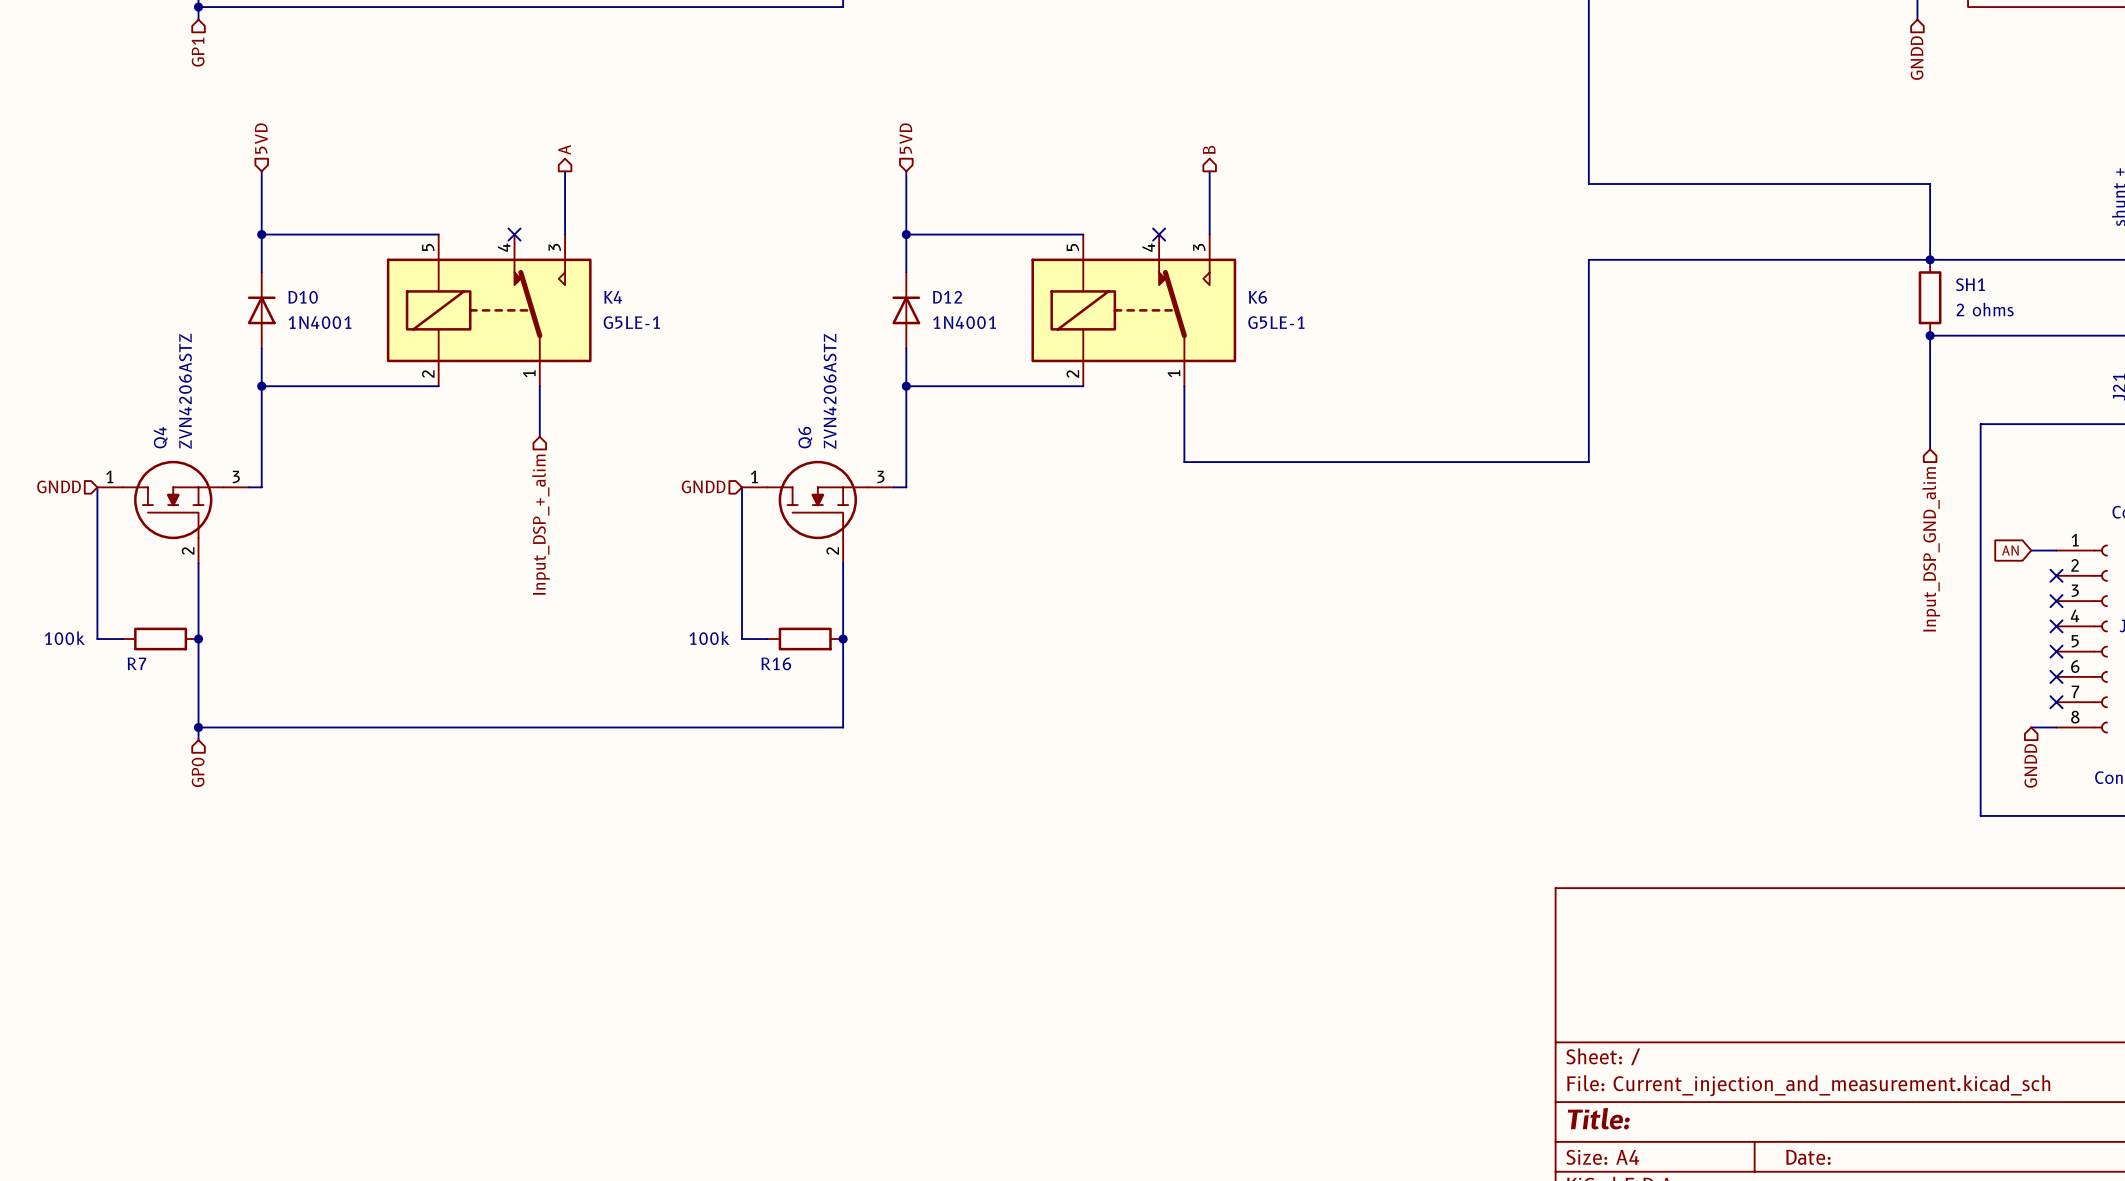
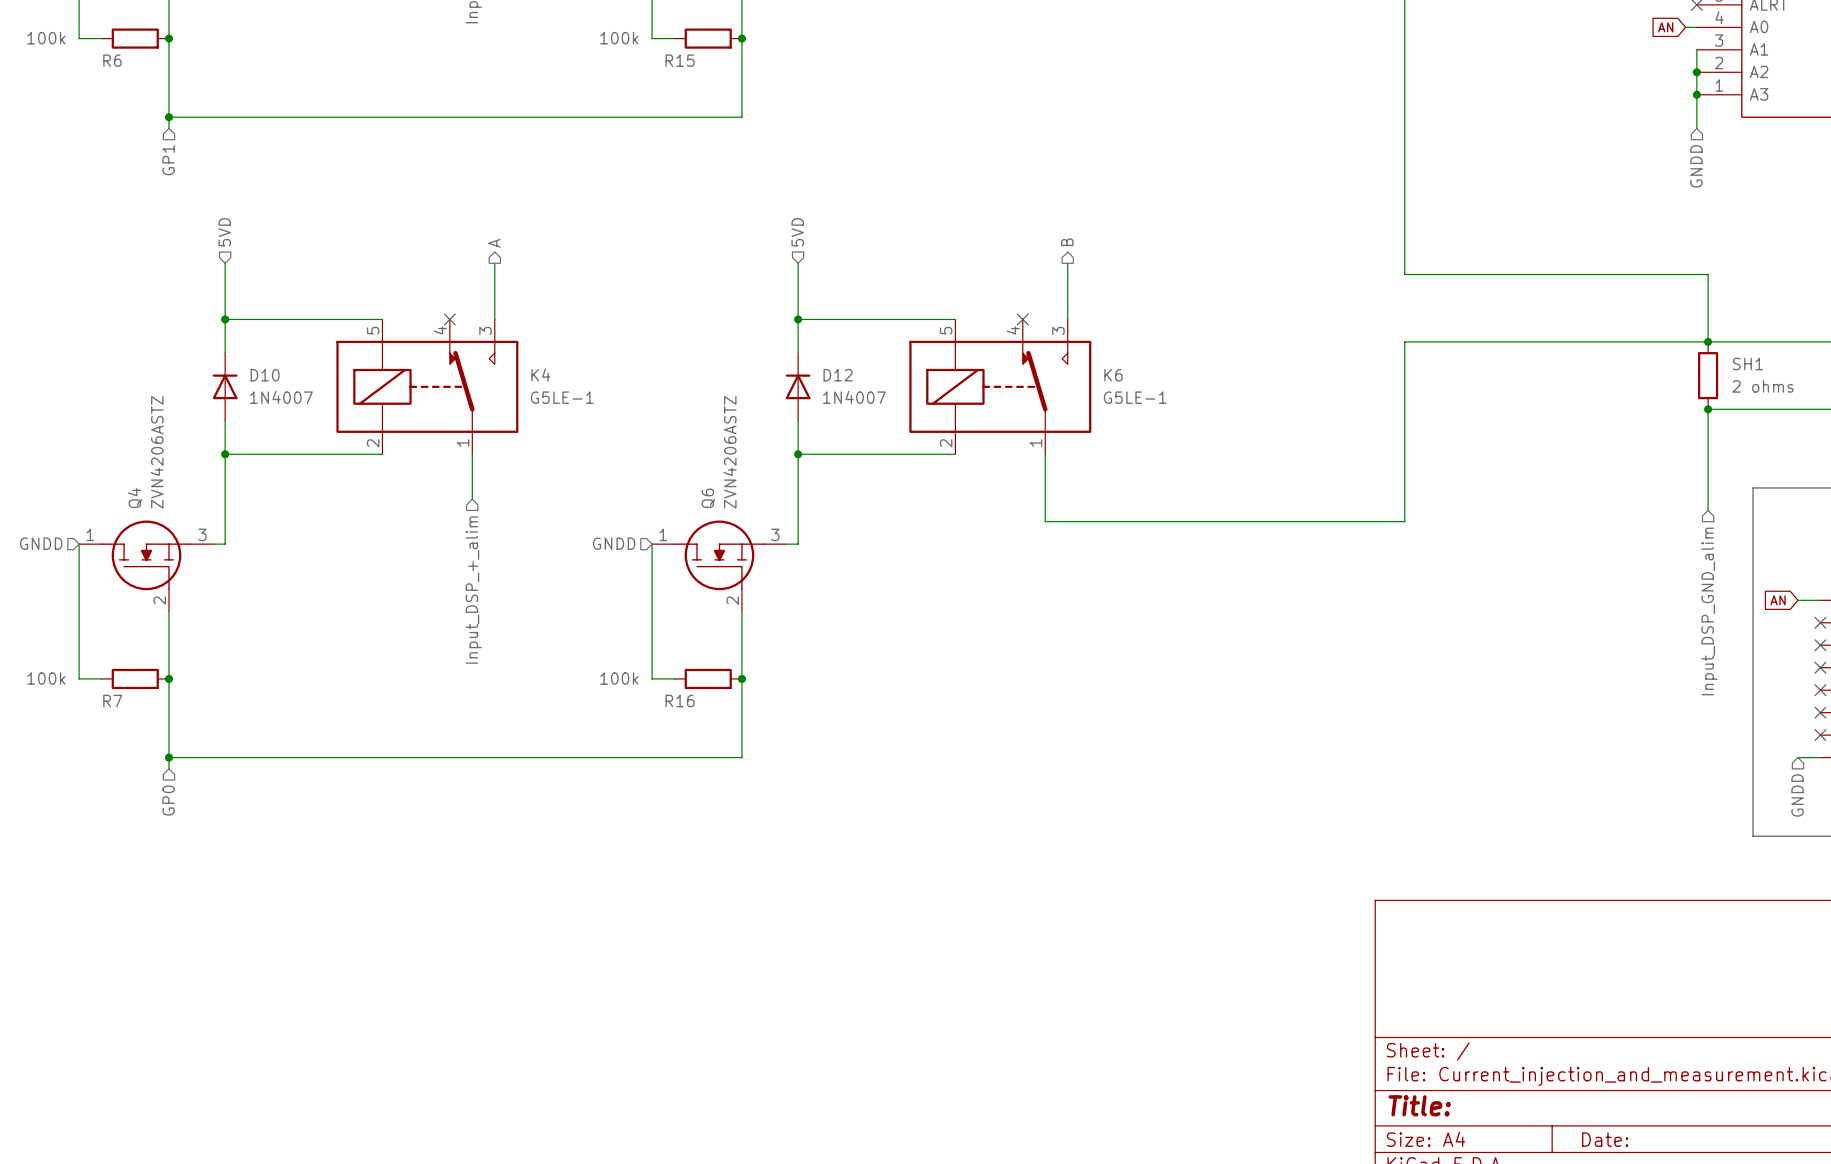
D10 value: 1N4001 (320, 322) -> 1N4007 (281, 397)
D12 value: 1N4001 (964, 322) -> 1N4007 (854, 397)

